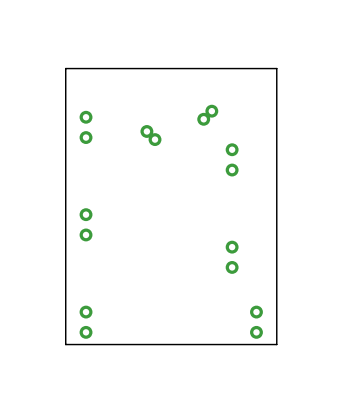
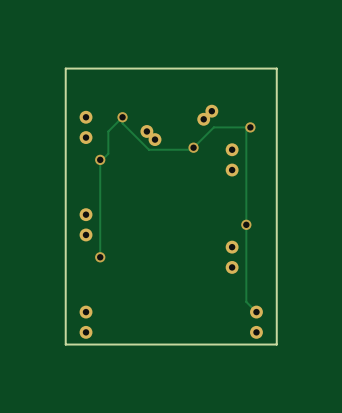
via: none -> (122, 117)
track: none -> (246, 127) (246, 301) (256, 312)
track: none -> (250, 127) (213, 127) (191, 149) (148, 149) (122, 123) (122, 117) (108, 131) (108, 153) (100, 159) (100, 257)
via: none -> (250, 127)
via: none -> (193, 147)
via: none -> (100, 159)
via: none -> (246, 224)
via: none -> (100, 257)

